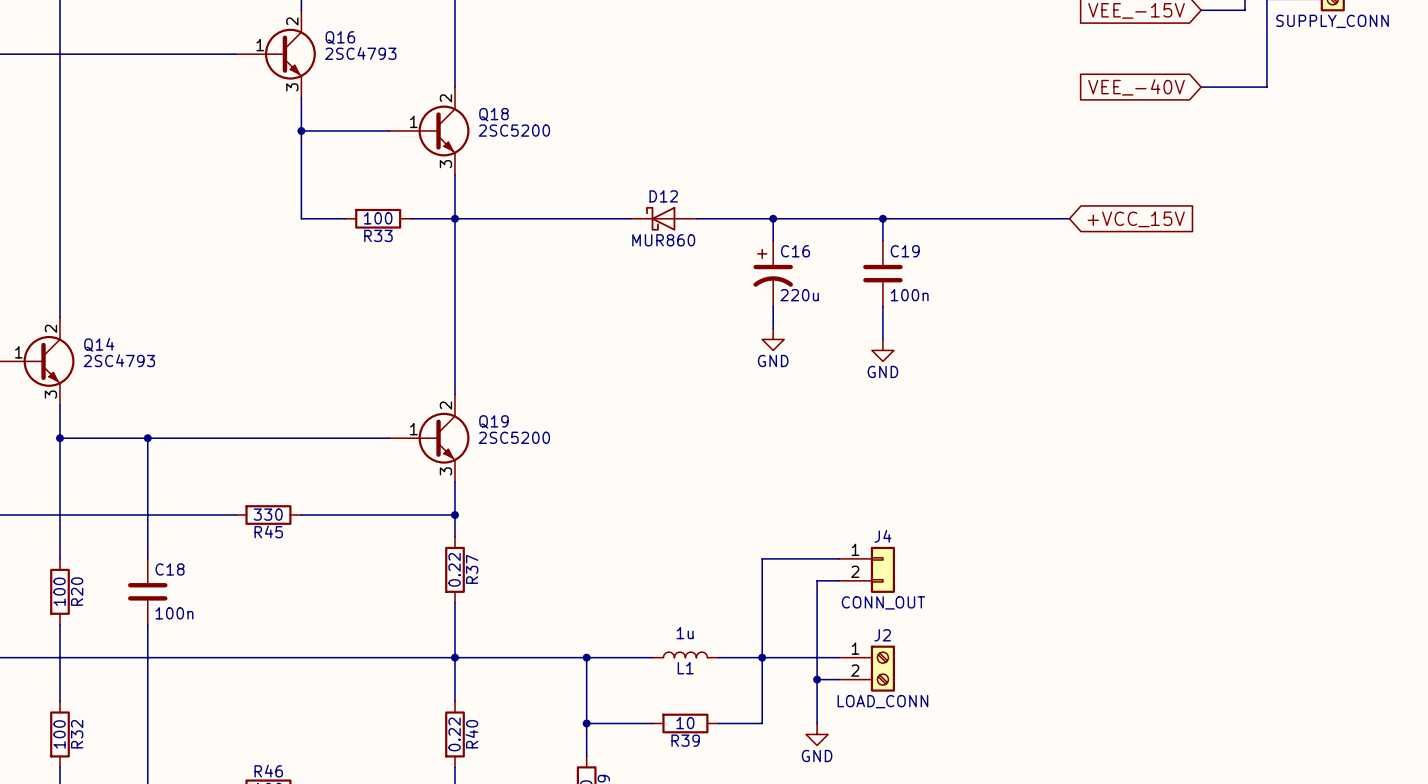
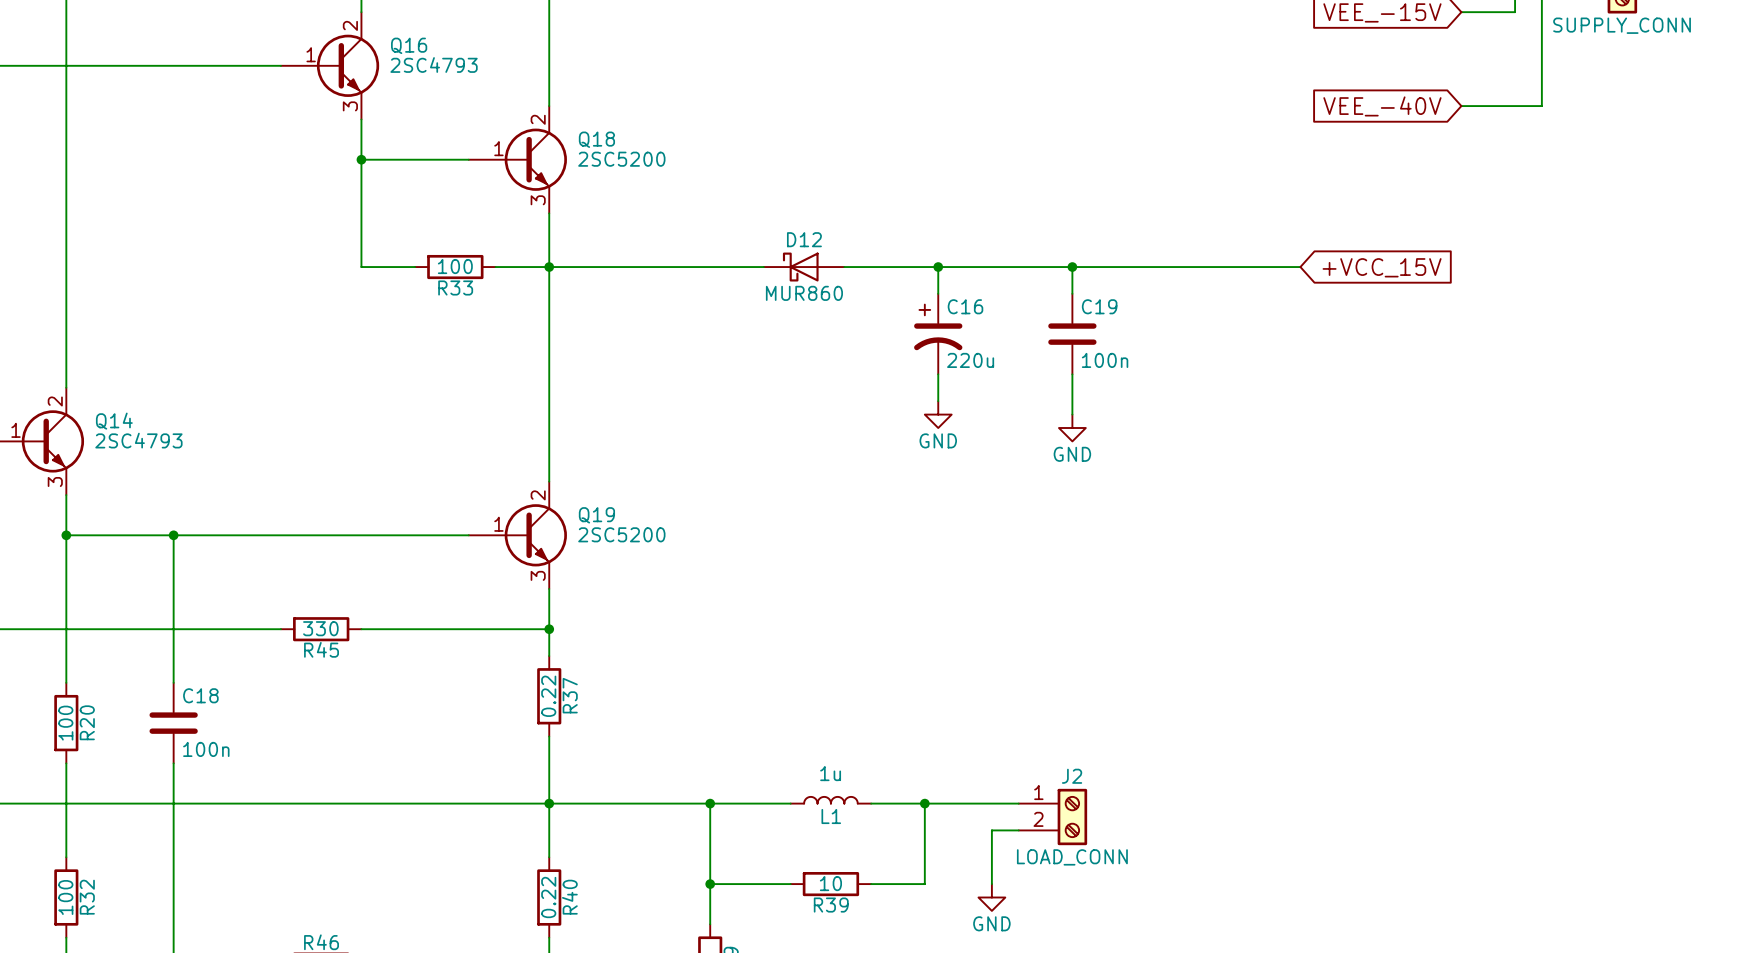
wire: (839, 558) (762, 558) (762, 657) -> none
J4: CONN_OUT (867, 569) -> none
wire: (839, 580) (817, 580) (817, 679) -> none
junction: (817, 679) -> none

